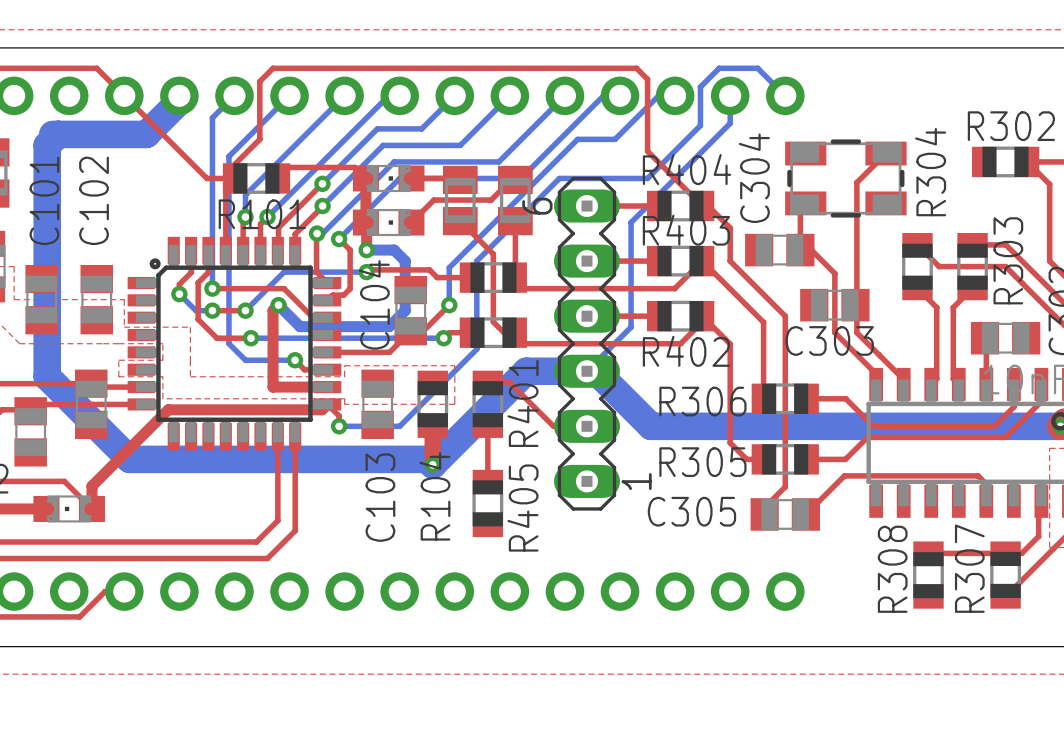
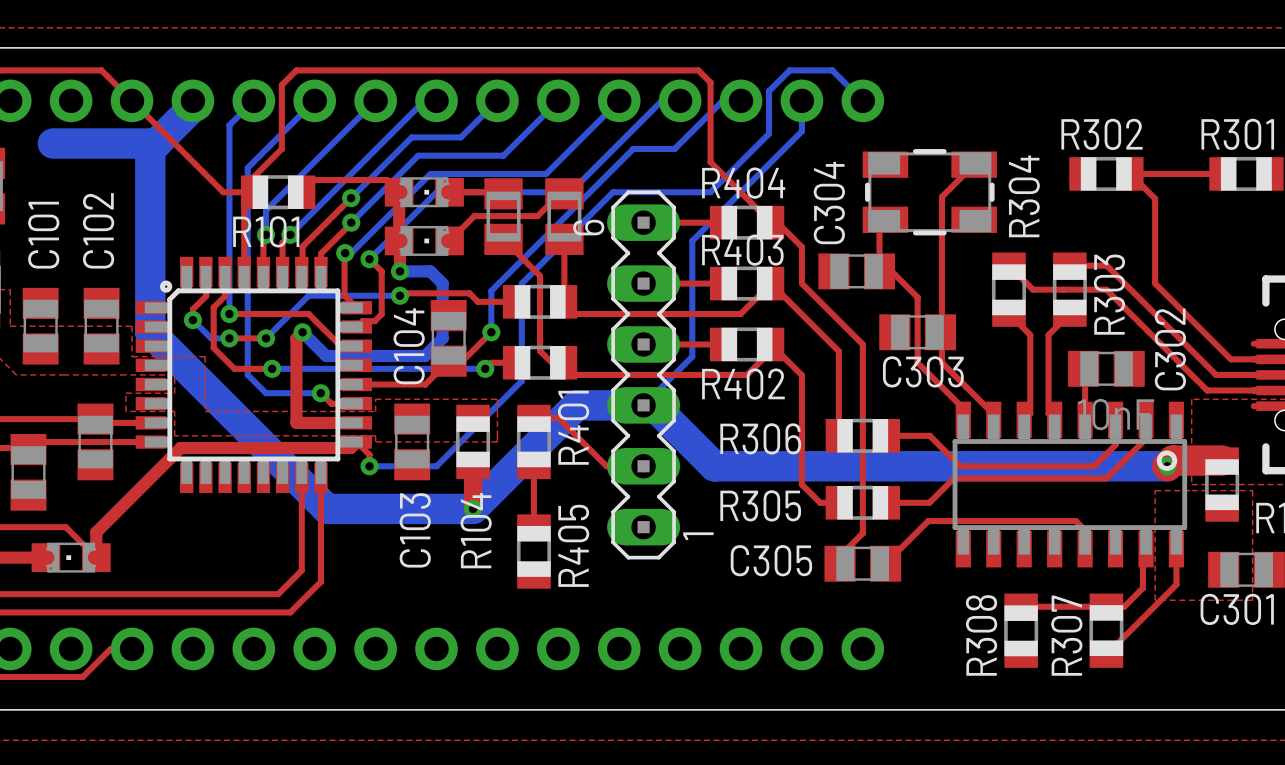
bottom track: (58, 134) (47, 145) (47, 376) (129, 459) (427, 459) (432, 464) -> (156, 143) (150, 149) (150, 332) (326, 508) (473, 508)

